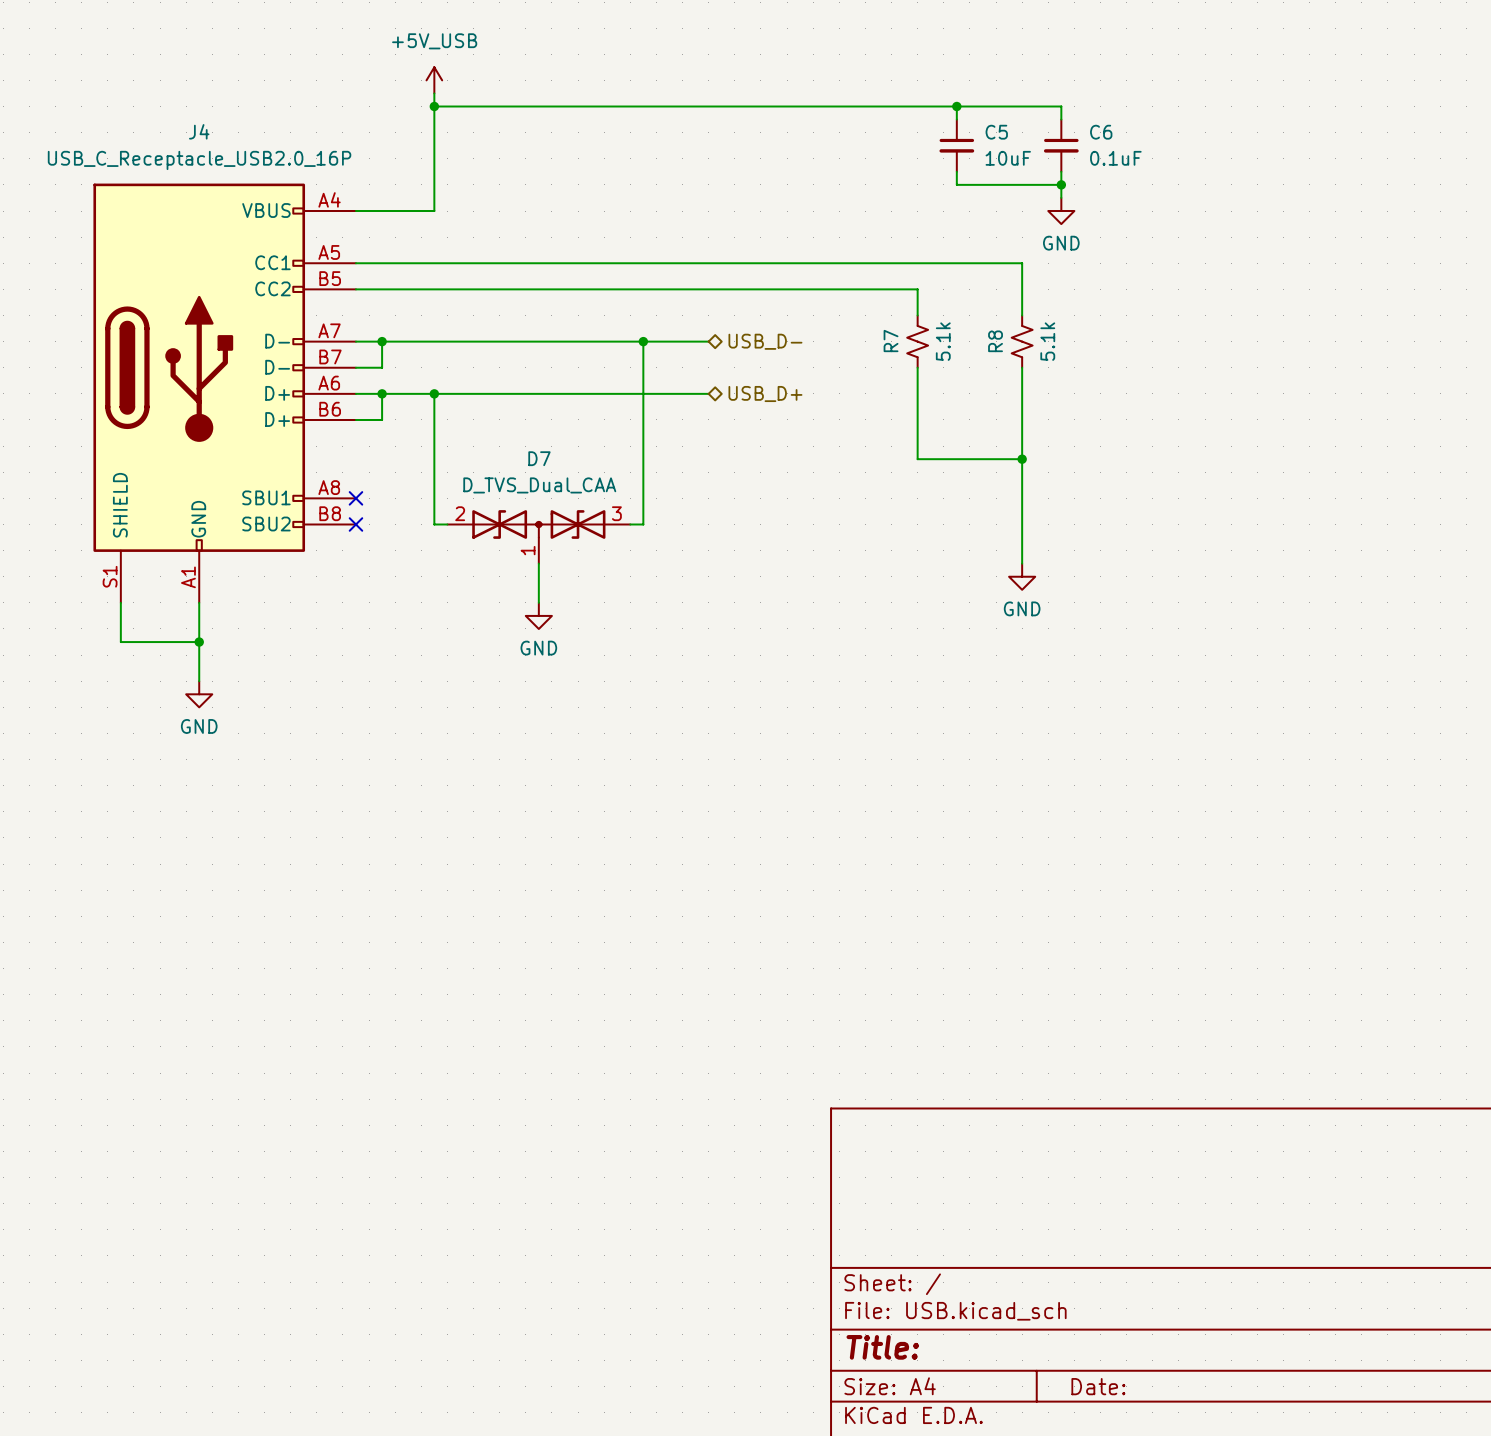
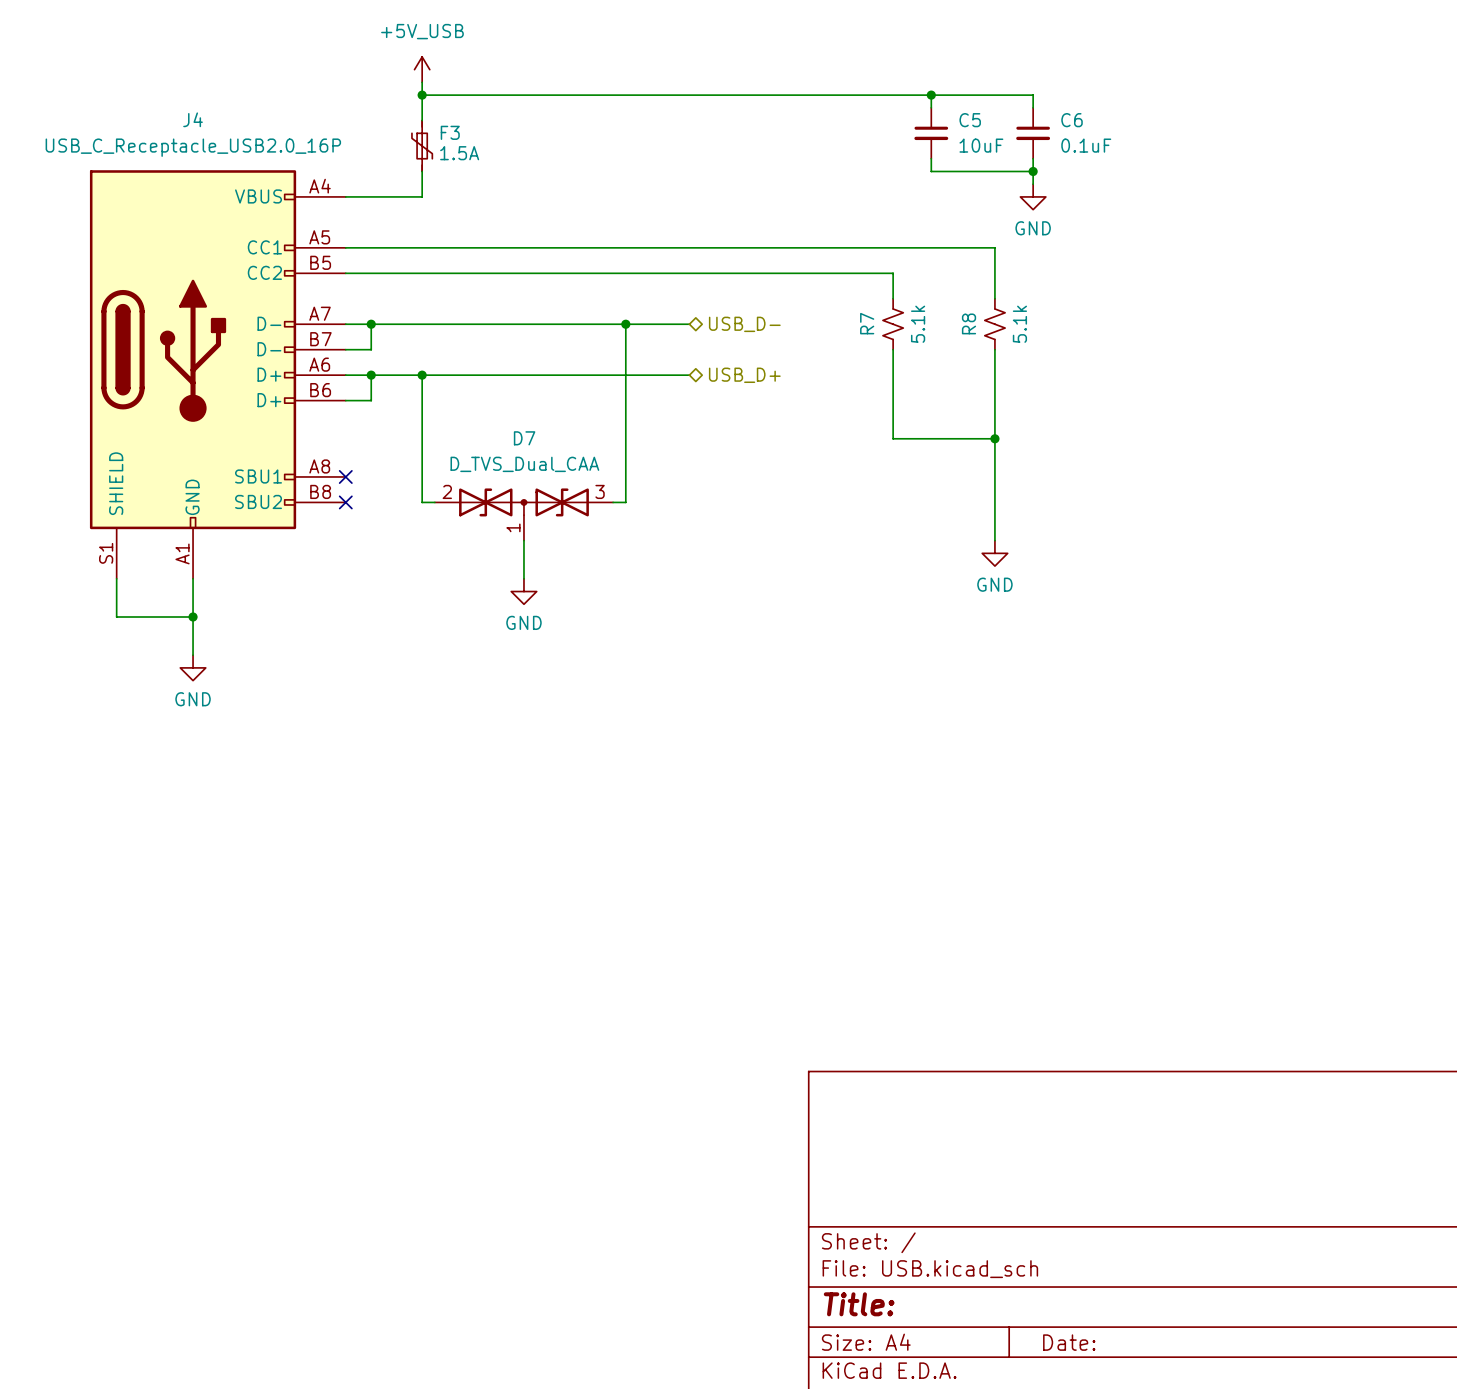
F3: none -> 1.5A (422, 146)

